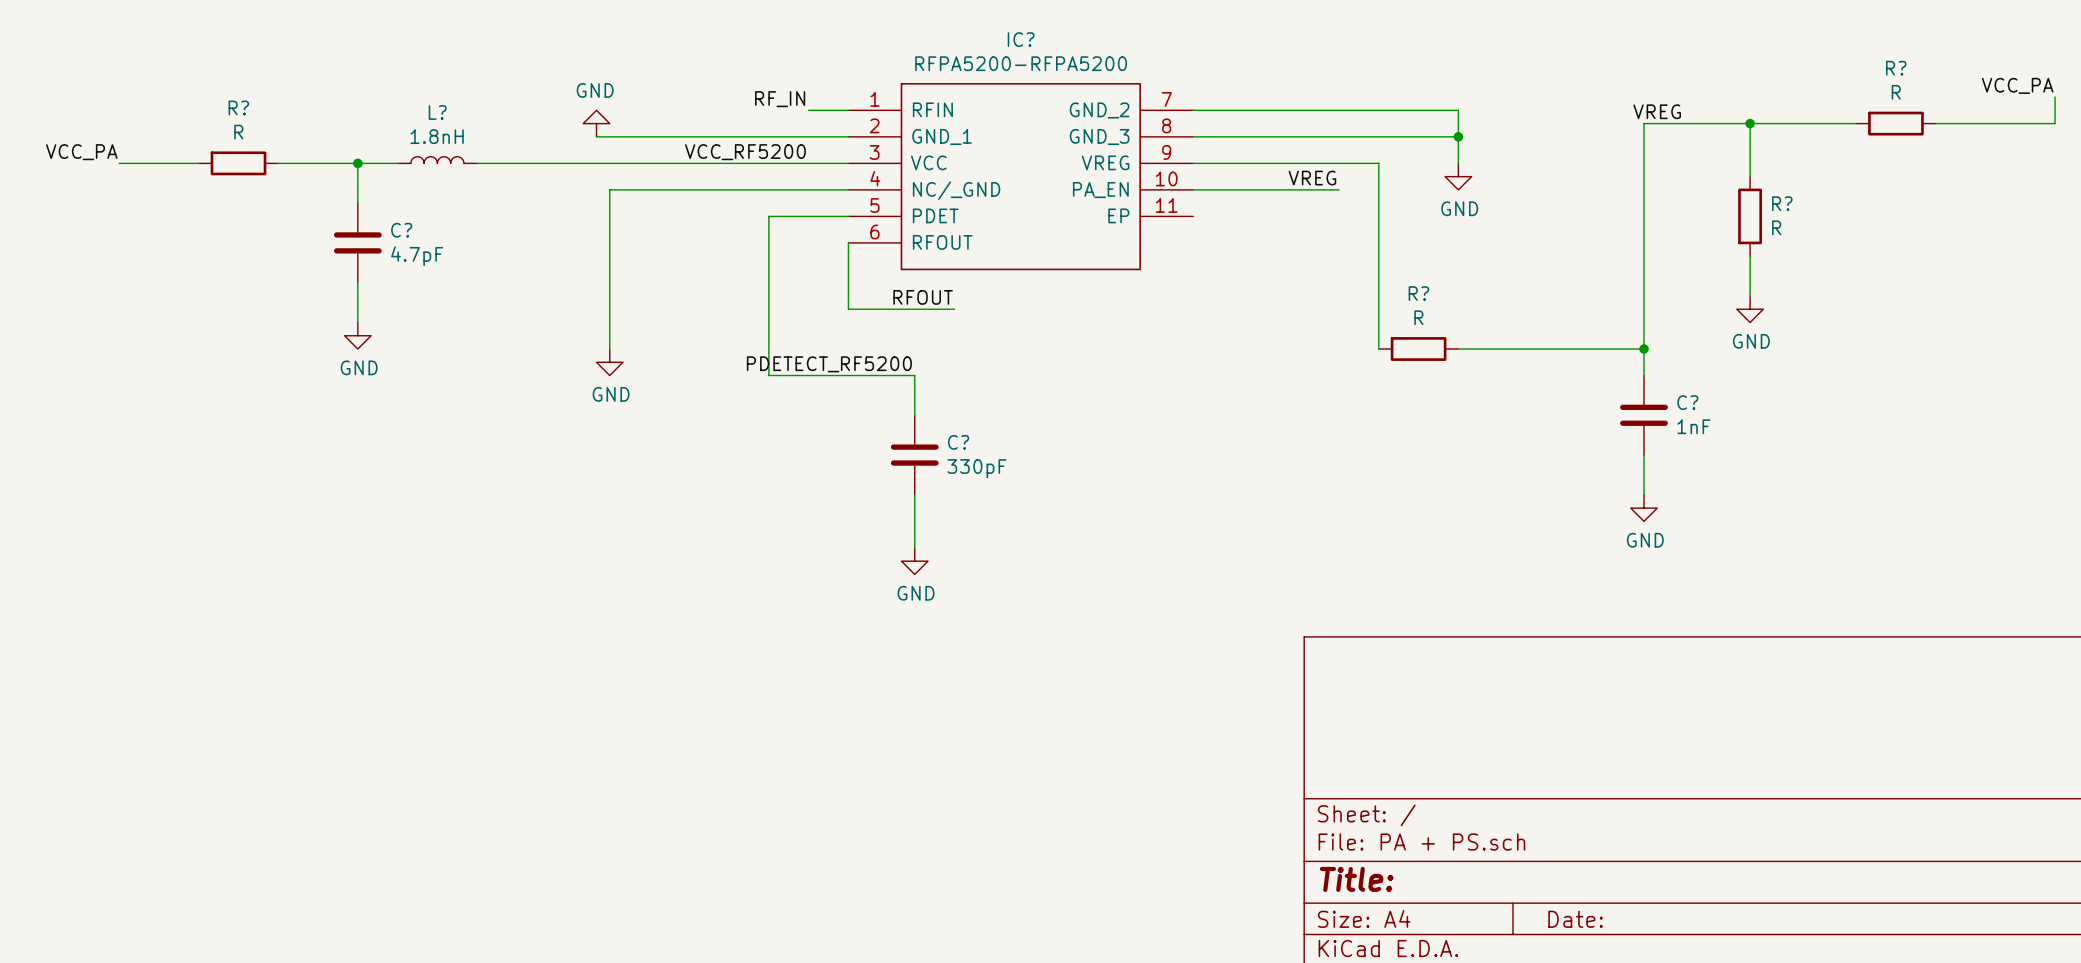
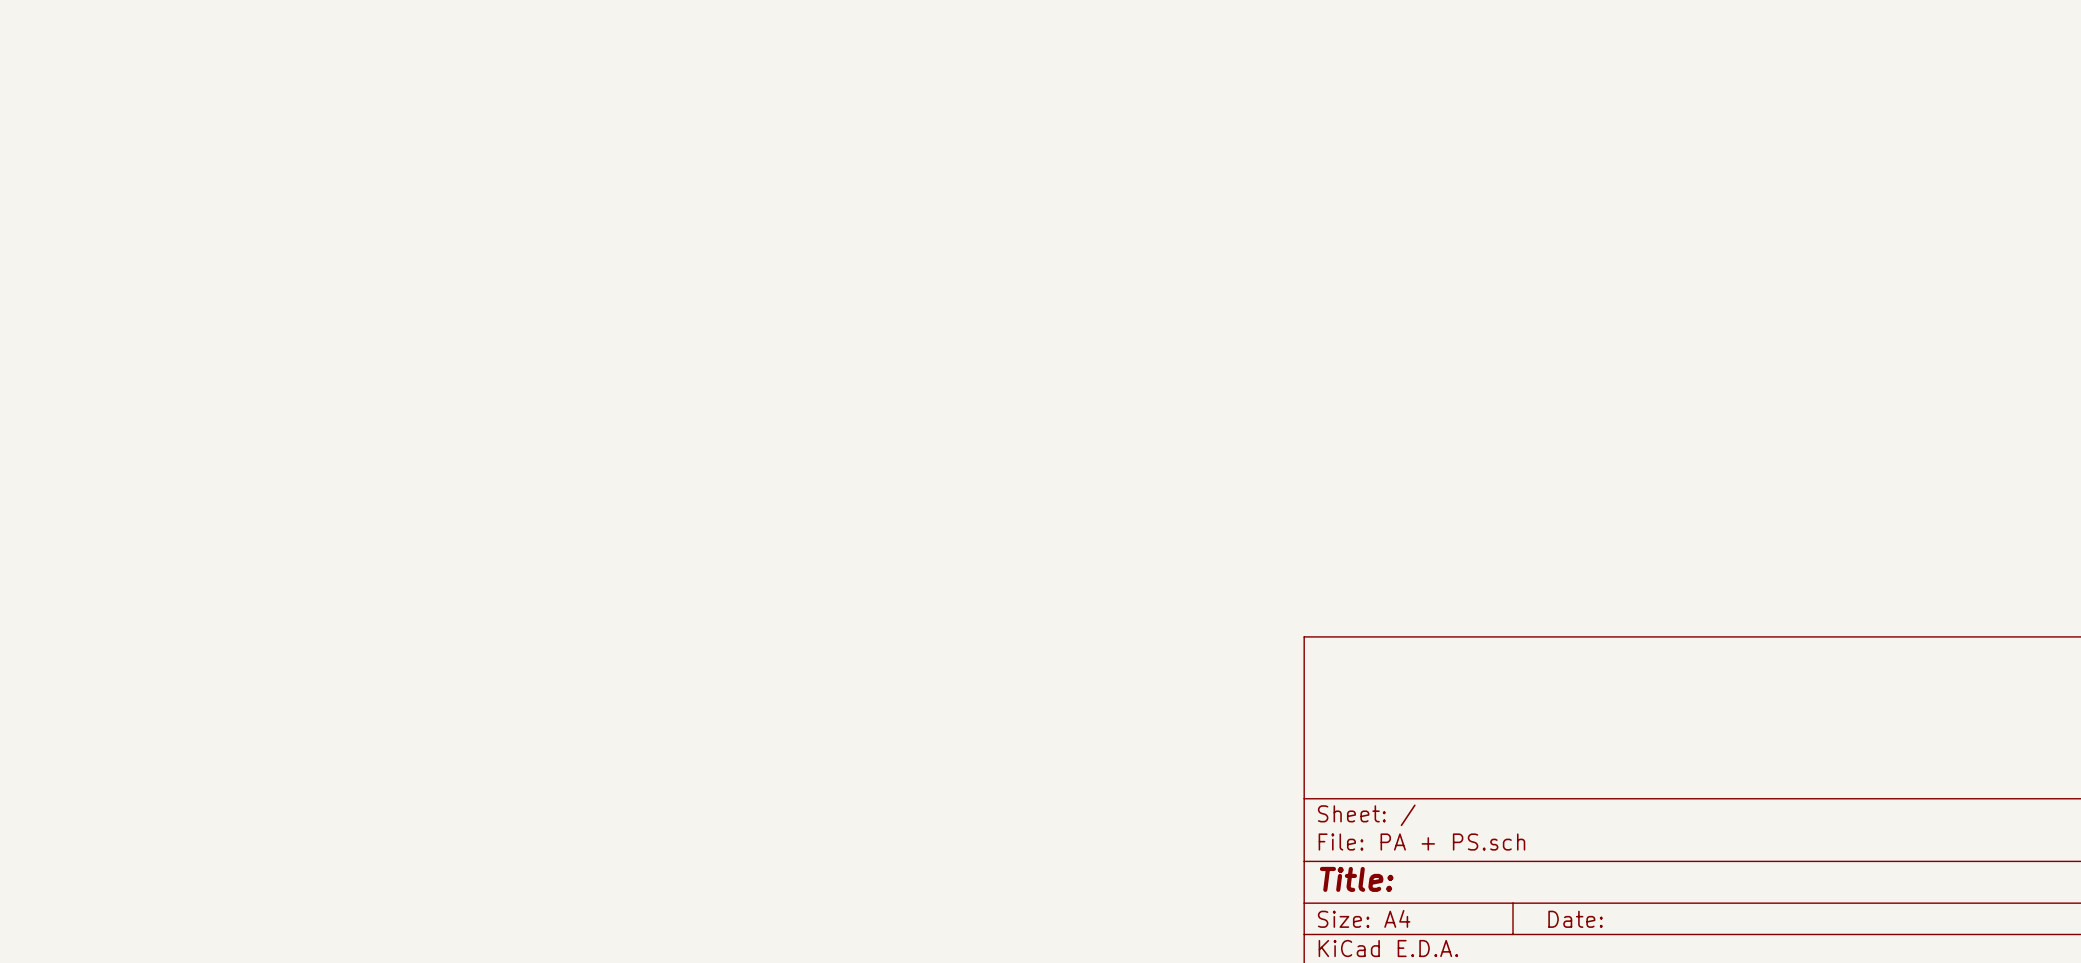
label: VCC_PA (2017, 85) -> none
wire: (2055, 97) (2055, 123) (1935, 123) -> none
label: RF_IN (780, 99) -> none
wire: (808, 110) (848, 110) -> none
wire: (1193, 110) (1458, 110) (1458, 163) -> none
label: VREG (1657, 111) -> none
power symbol: GND (596, 123) -> none
wire: (1750, 123) (1750, 176) -> none
junction: (1750, 123) -> none
wire: (1856, 123) (1644, 123) (1644, 375) -> none
R?: R (1895, 123) -> none
wire: (596, 136) (848, 136) -> none
wire: (1193, 136) (1458, 136) -> none
junction: (1458, 136) -> none
label: VCC_PA (81, 152) -> none
label: VCC_RF5200 (745, 152) -> none
L?: 1.8nH (437, 160) -> none
wire: (119, 163) (198, 163) -> none
R?: R (238, 163) -> none
wire: (278, 163) (397, 163) -> none
wire: (357, 163) (357, 203) -> none
junction: (357, 163) -> none
wire: (477, 163) (848, 163) -> none
wire: (1193, 163) (1378, 163) (1378, 349) -> none
IC?: RFPA5200-RFPA5200 (1020, 176) -> none
power symbol: GND (1458, 176) -> none
label: VREG (1312, 178) -> none
wire: (848, 189) (609, 189) (609, 349) -> none
wire: (1193, 189) (1339, 189) -> none
wire: (848, 216) (768, 216) (768, 375) (914, 375) (914, 415) -> none
R?: R (1750, 216) -> none
C?: 4.7pF (357, 242) -> none
wire: (848, 242) (848, 309) (954, 309) -> none
wire: (1750, 256) (1750, 295) -> none
wire: (357, 282) (357, 322) -> none
label: RFOUT (923, 297) -> none
power symbol: GND (1750, 309) -> none
power symbol: GND (357, 335) -> none
R?: R (1418, 349) -> none
wire: (1458, 349) (1644, 349) -> none
junction: (1644, 349) -> none
power symbol: GND (609, 362) -> none
label: PDETECT_RF5200 (829, 364) -> none
C?: 1nF (1644, 415) -> none
C?: 330pF (914, 455) -> none
wire: (1644, 455) (1644, 494) -> none
wire: (914, 494) (914, 547) -> none
power symbol: GND (1644, 508) -> none
power symbol: GND (914, 561) -> none

